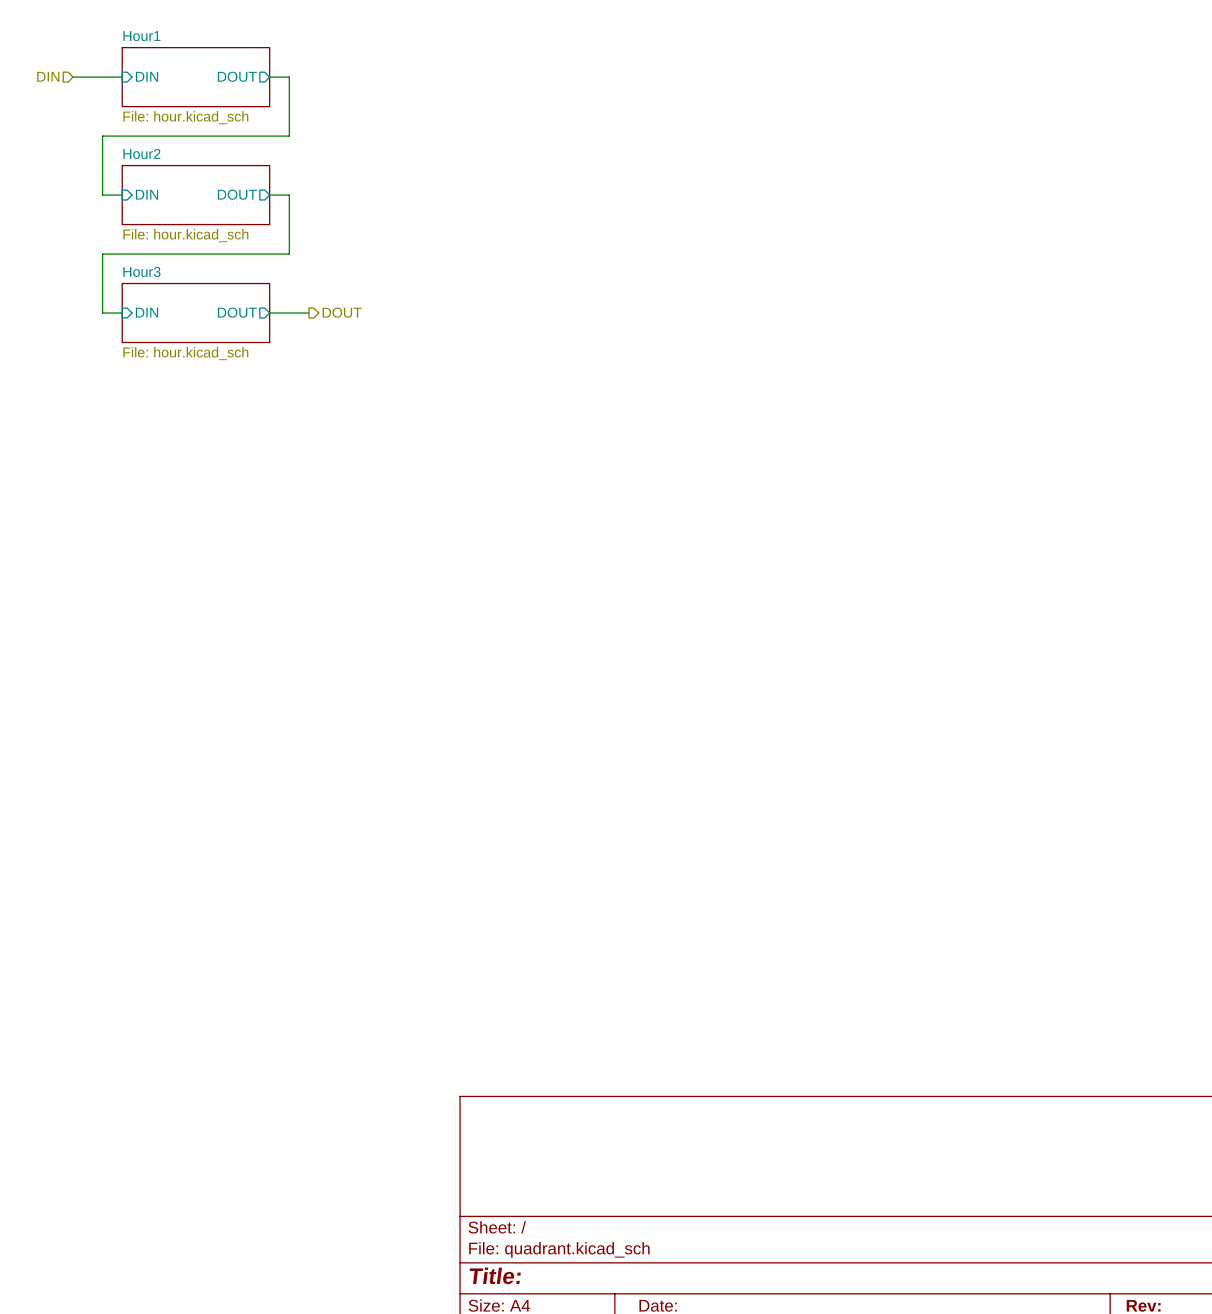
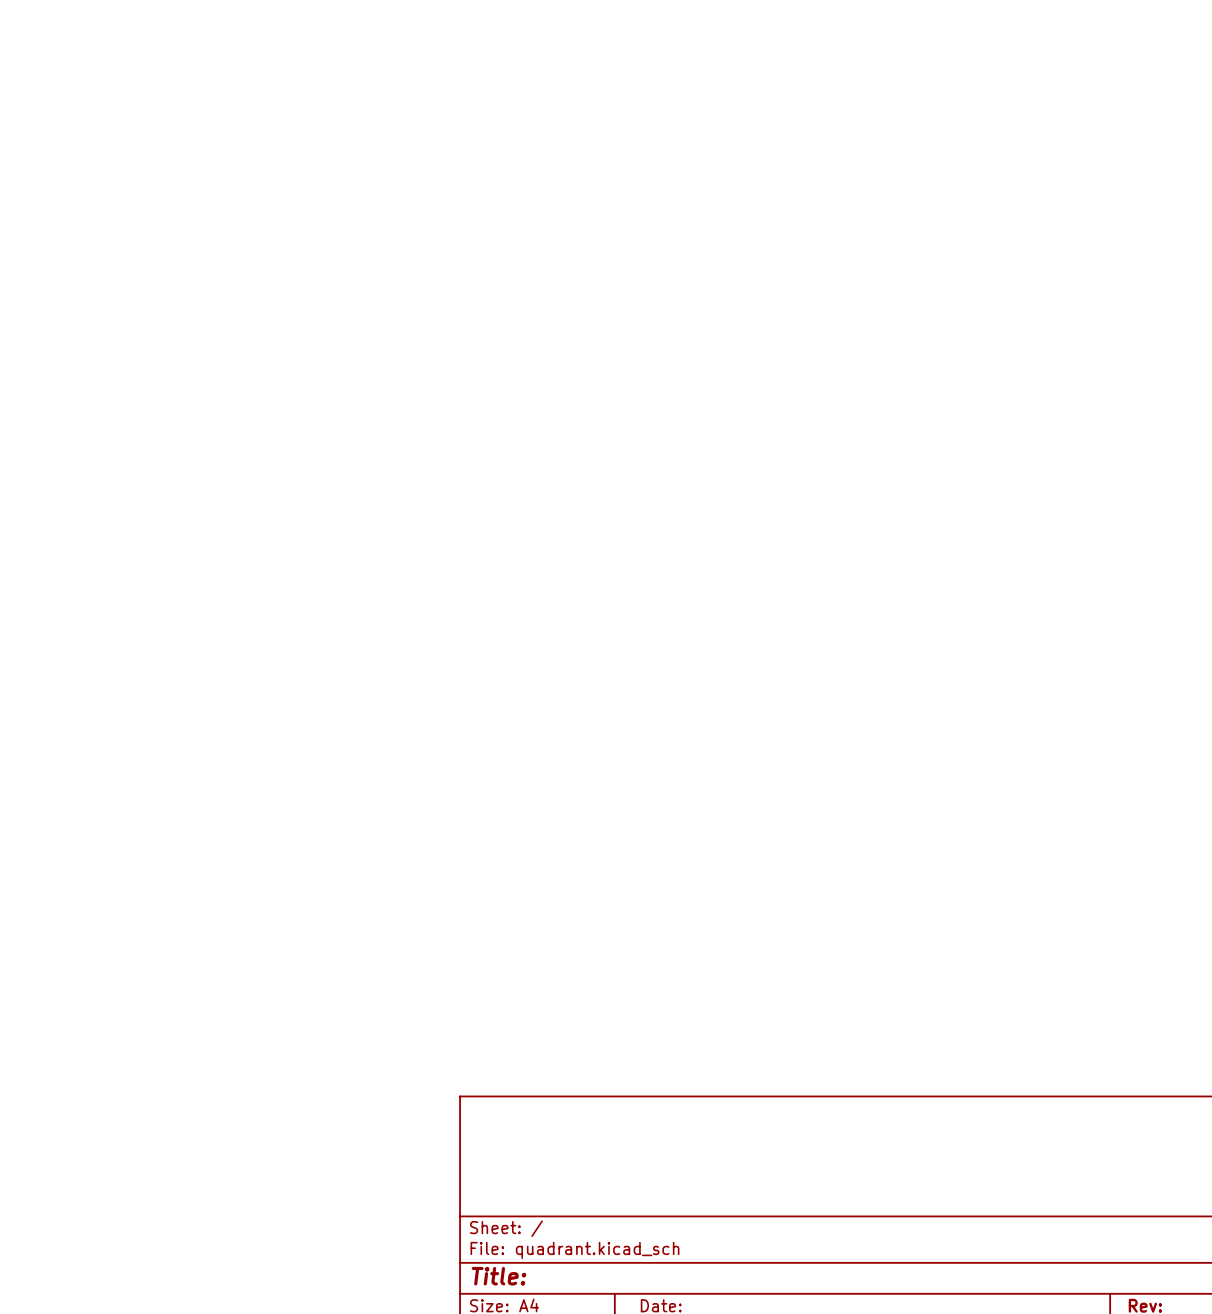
hierarchical label: DIN (48, 76) -> none
sheet pin: DIN (147, 76) -> none
sheet pin: DOUT (237, 76) -> none
wire: (73, 77) (122, 77) -> none
sheet Hour1: File: hour.kicad_sch (195, 77) -> none
wire: (269, 77) (289, 77) (289, 136) (102, 136) (102, 195) (122, 195) -> none
sheet pin: DIN (147, 194) -> none
sheet pin: DOUT (237, 194) -> none
sheet Hour2: File: hour.kicad_sch (195, 195) -> none
wire: (269, 195) (289, 195) (289, 254) (102, 254) (102, 313) (122, 313) -> none
sheet pin: DIN (147, 312) -> none
sheet pin: DOUT (237, 312) -> none
hierarchical label: DOUT (342, 312) -> none
sheet Hour3: File: hour.kicad_sch (195, 313) -> none
wire: (269, 313) (308, 313) -> none

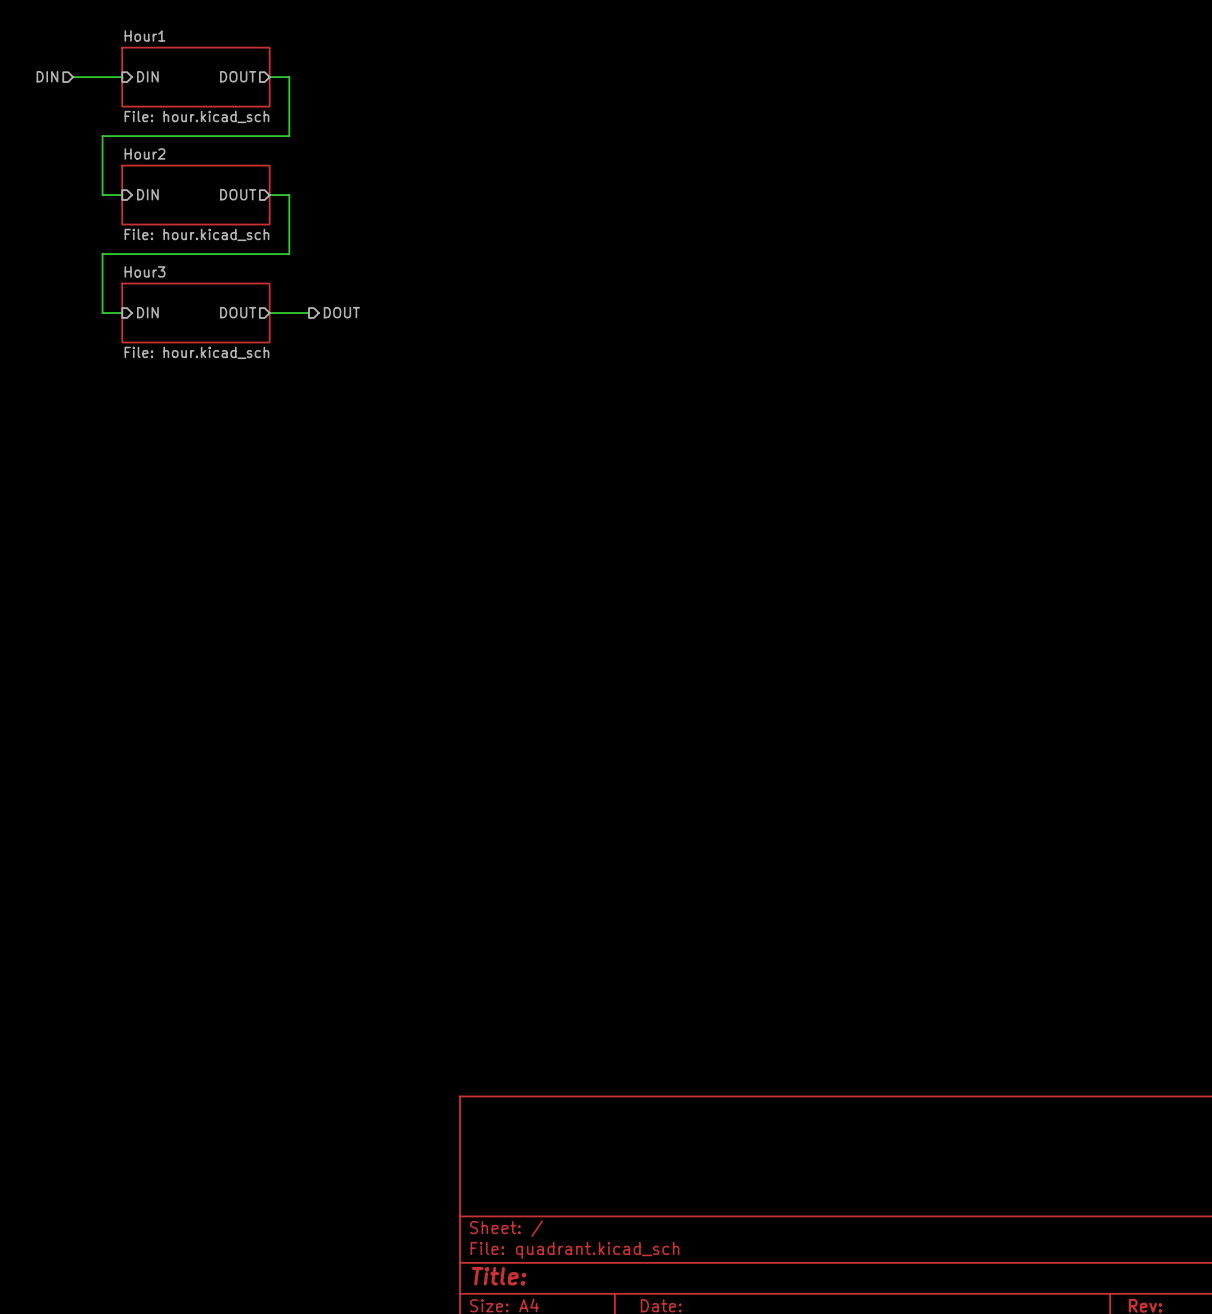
hierarchical label: none -> DIN (47, 76)
sheet pin: none -> DIN (147, 76)
sheet pin: none -> DOUT (238, 76)
wire: none -> (73, 77) (122, 77)
sheet Hour1: none -> File: hour.kicad_sch (195, 77)
wire: none -> (269, 77) (289, 77) (289, 136) (102, 136) (102, 195) (122, 195)
sheet pin: none -> DIN (147, 194)
sheet pin: none -> DOUT (238, 194)
sheet Hour2: none -> File: hour.kicad_sch (195, 195)
wire: none -> (269, 195) (289, 195) (289, 254) (102, 254) (102, 313) (122, 313)
sheet pin: none -> DIN (147, 312)
sheet pin: none -> DOUT (238, 312)
hierarchical label: none -> DOUT (341, 312)
sheet Hour3: none -> File: hour.kicad_sch (195, 313)
wire: none -> (269, 313) (308, 313)

